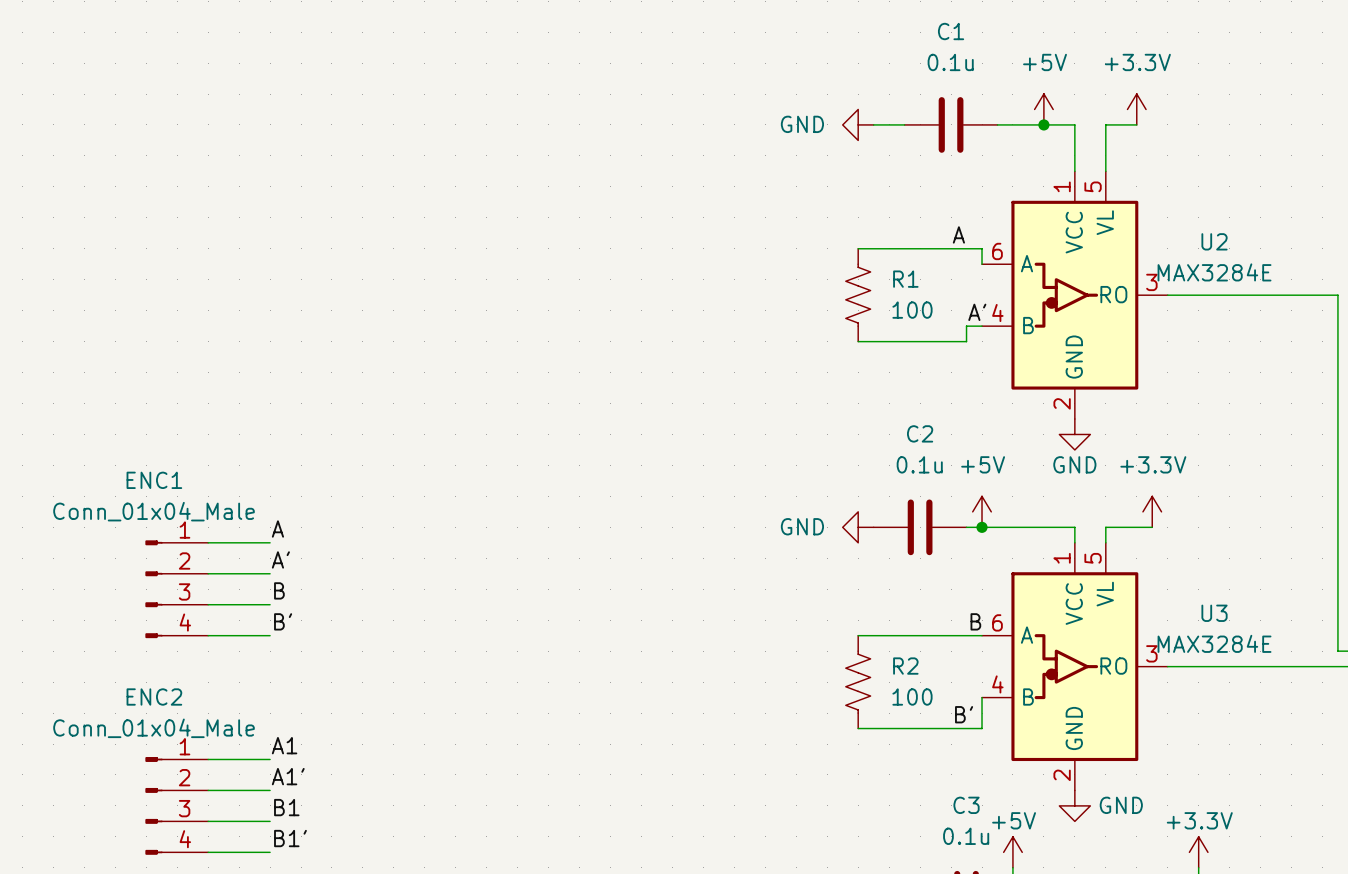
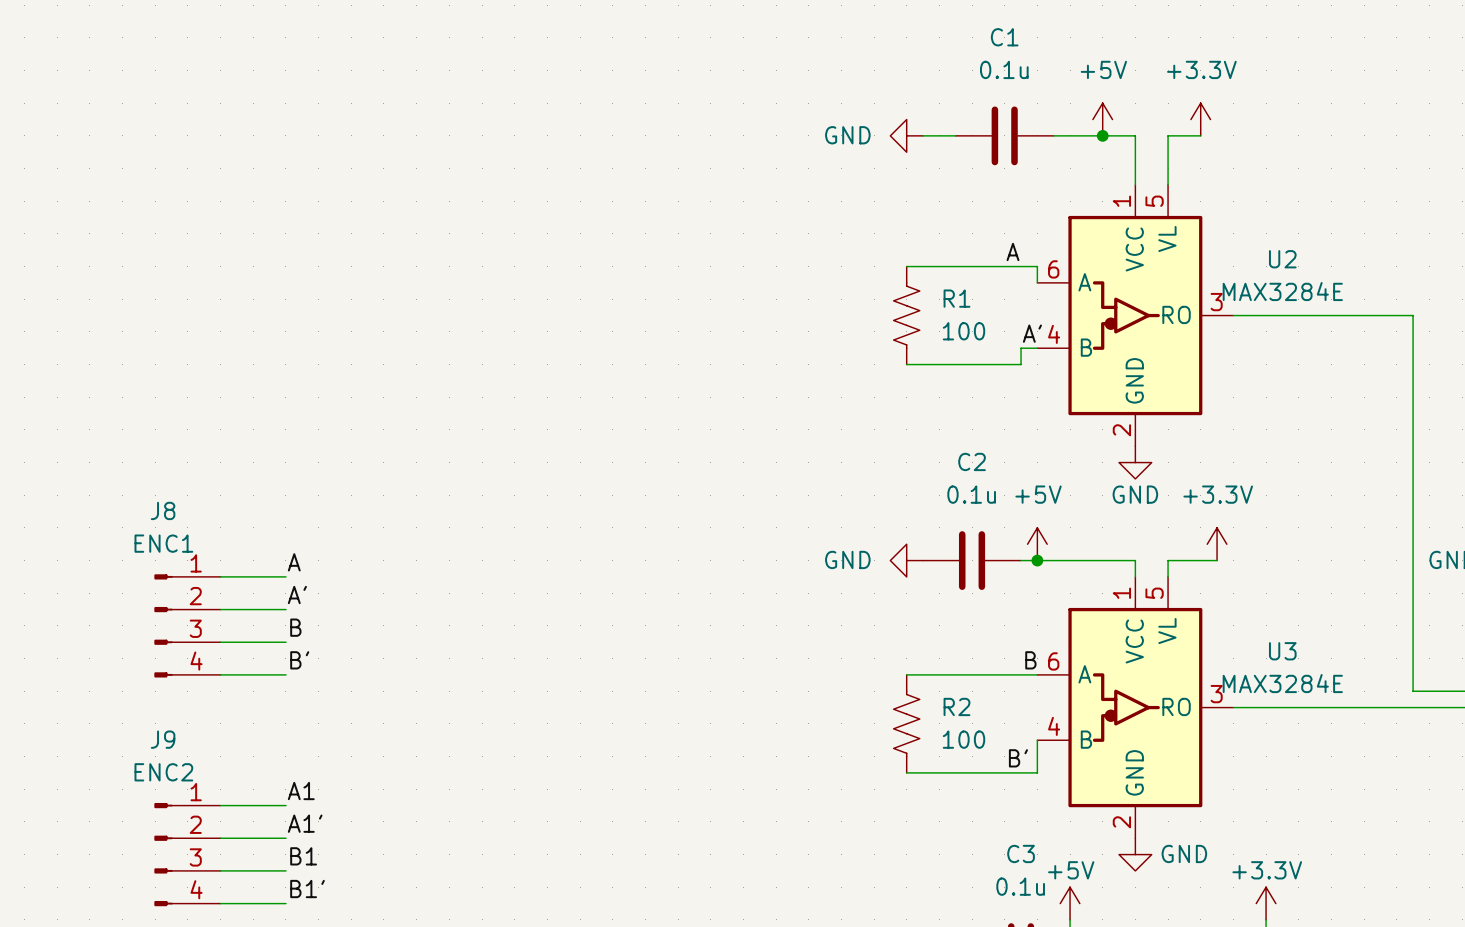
ENC1 name: ENC1 (154, 480) -> J8 (163, 510)
ENC1 value: Conn_01x04_Male (154, 511) -> ENC1 (163, 543)
ENC2 name: ENC2 (154, 697) -> J9 (163, 739)
ENC2 value: Conn_01x04_Male (154, 728) -> ENC2 (163, 772)

